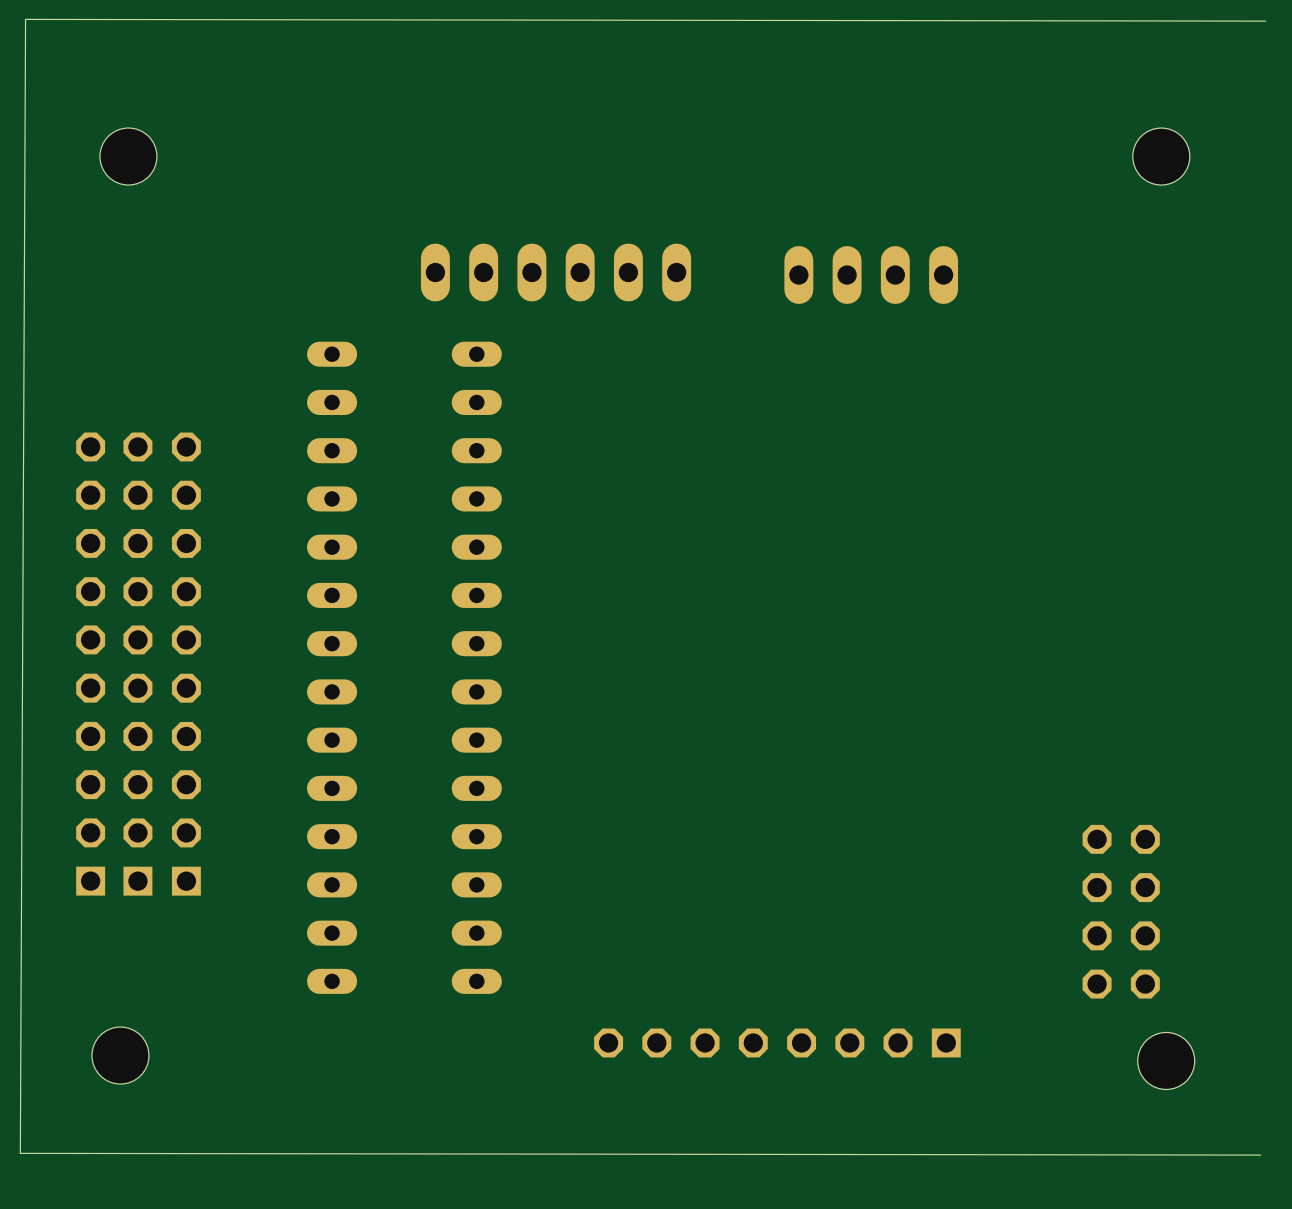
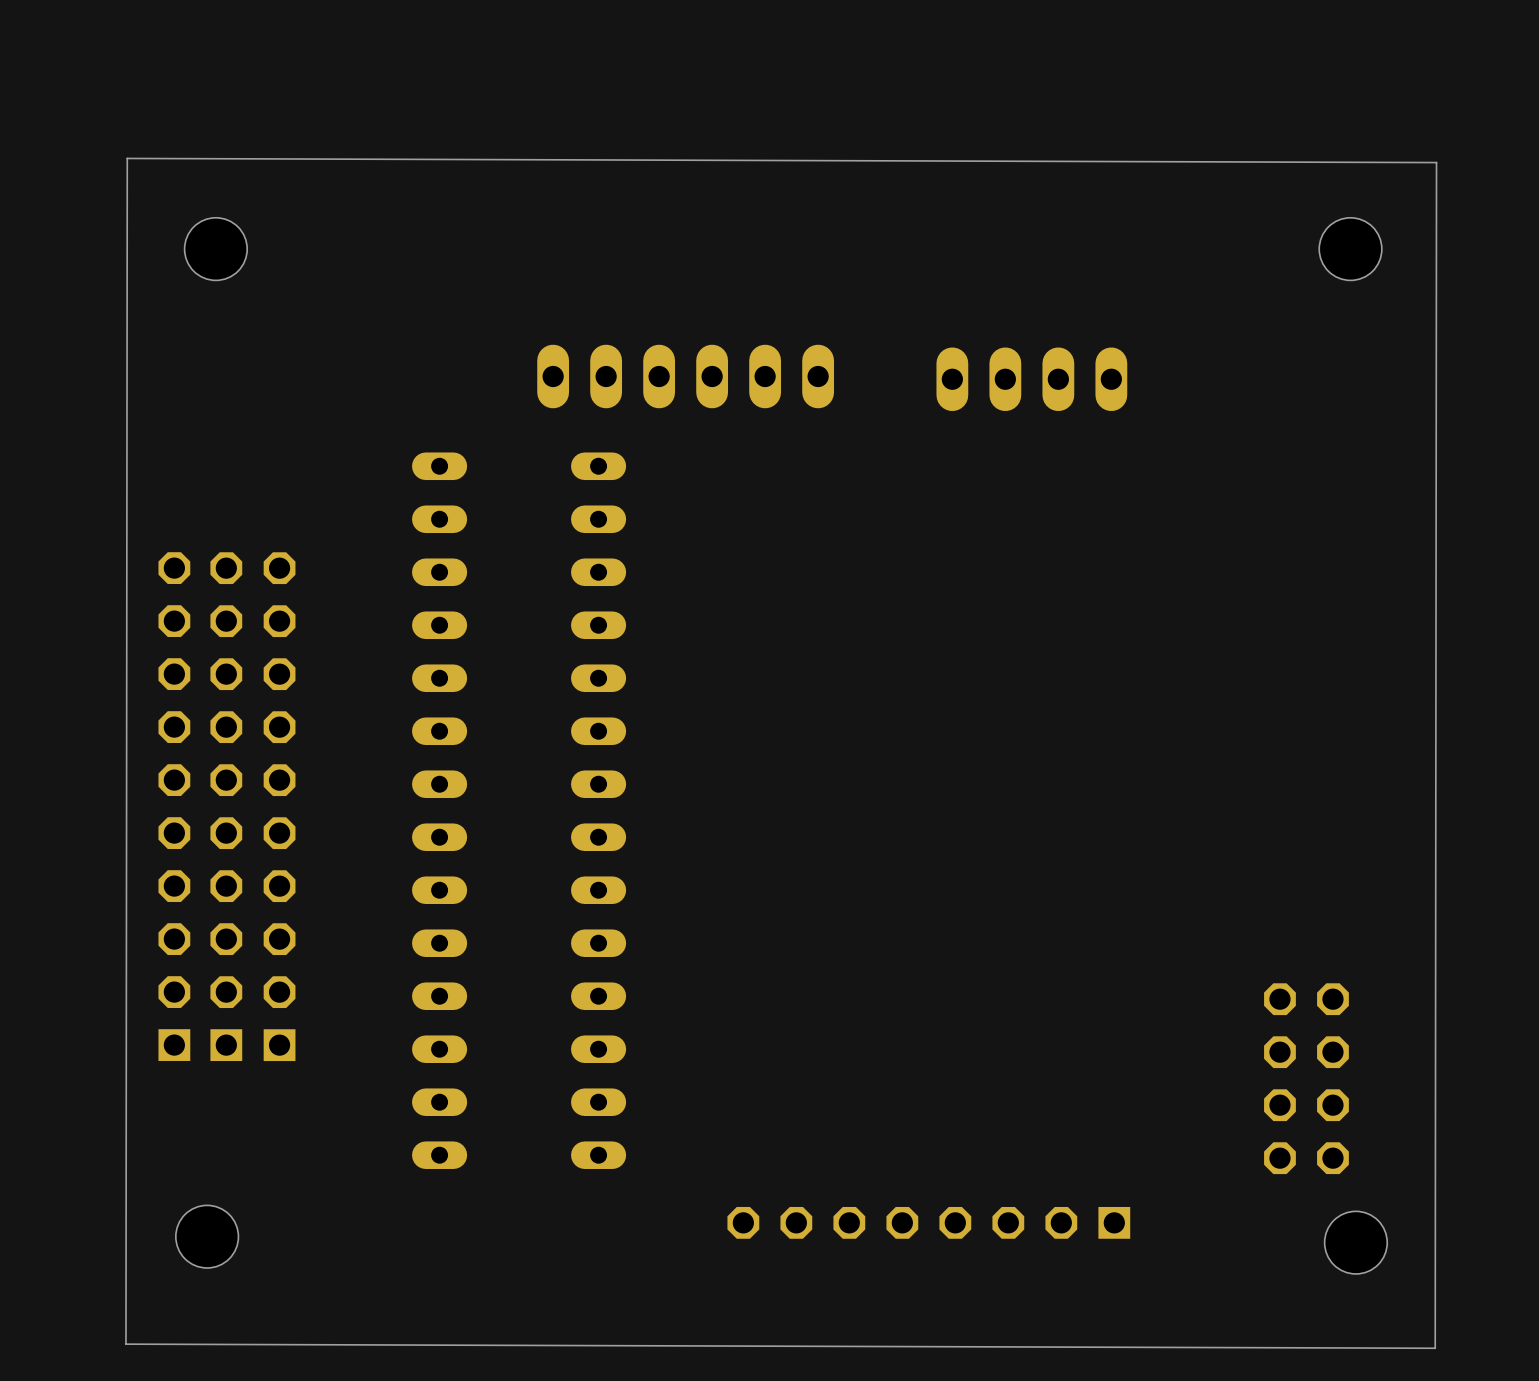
board edge: (1265, 21) (25, 19) (20, 1153) (1260, 1155) -> none
board edge: none -> (127, 158) (125, 1344) (1435, 1348) (1436, 162) (127, 158)

